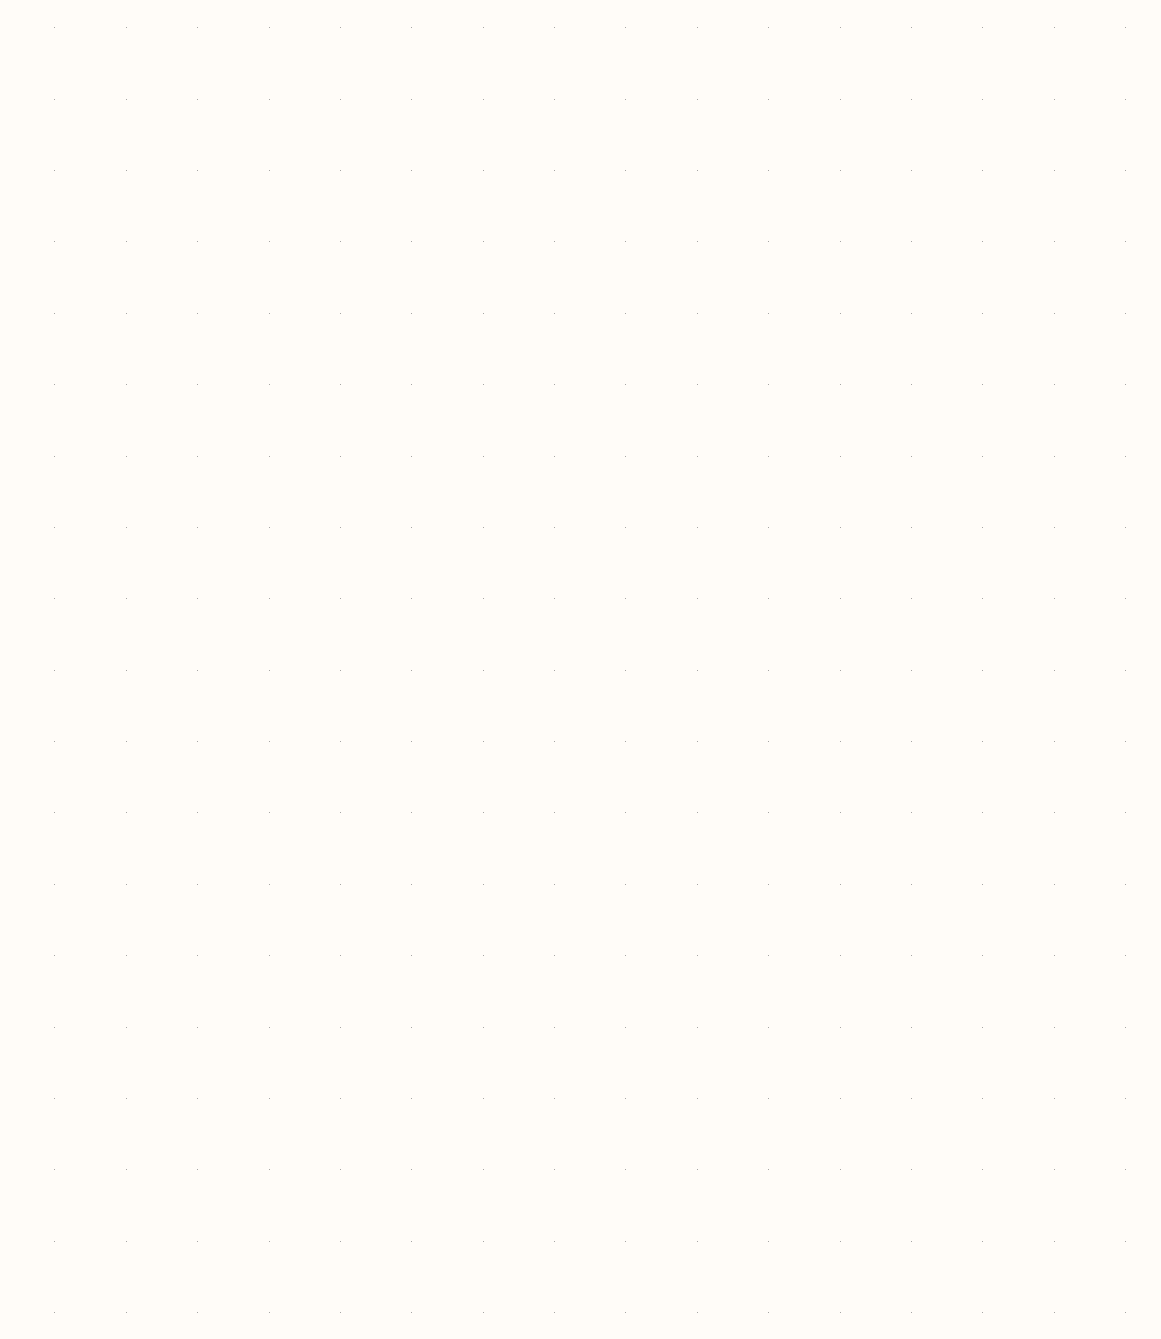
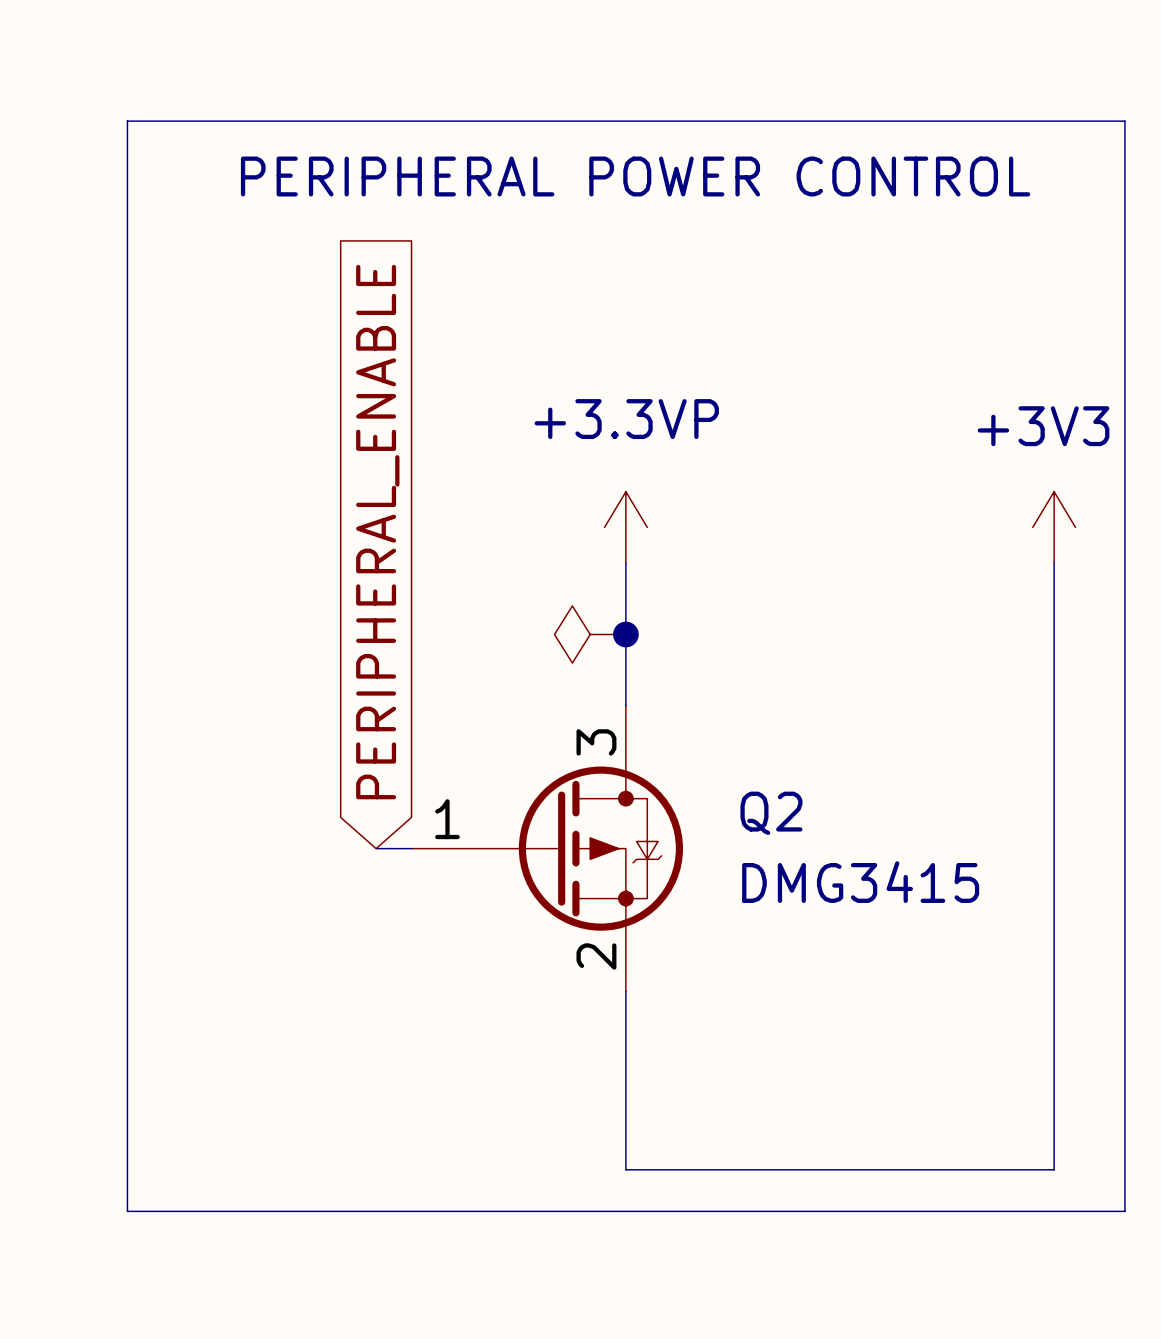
line: none -> (127, 121) (1124, 121) (1124, 1211) (127, 1211) (127, 121)
text: none -> PERIPHERAL POWER CONTROL (635, 176)
power symbol: none -> +3.3VP (625, 527)
power symbol: none -> +3V3 (1054, 527)
global label: none -> PERIPHERAL_ENABLE (377, 532)
wire: none -> (625, 563) (625, 705)
wire: none -> (1054, 563) (1054, 1169) (625, 1169) (625, 991)
power symbol: none -> (590, 634)
junction: none -> (625, 634)
wire: none -> (376, 848) (411, 848)
Q2: none -> DMG3415 (547, 848)

